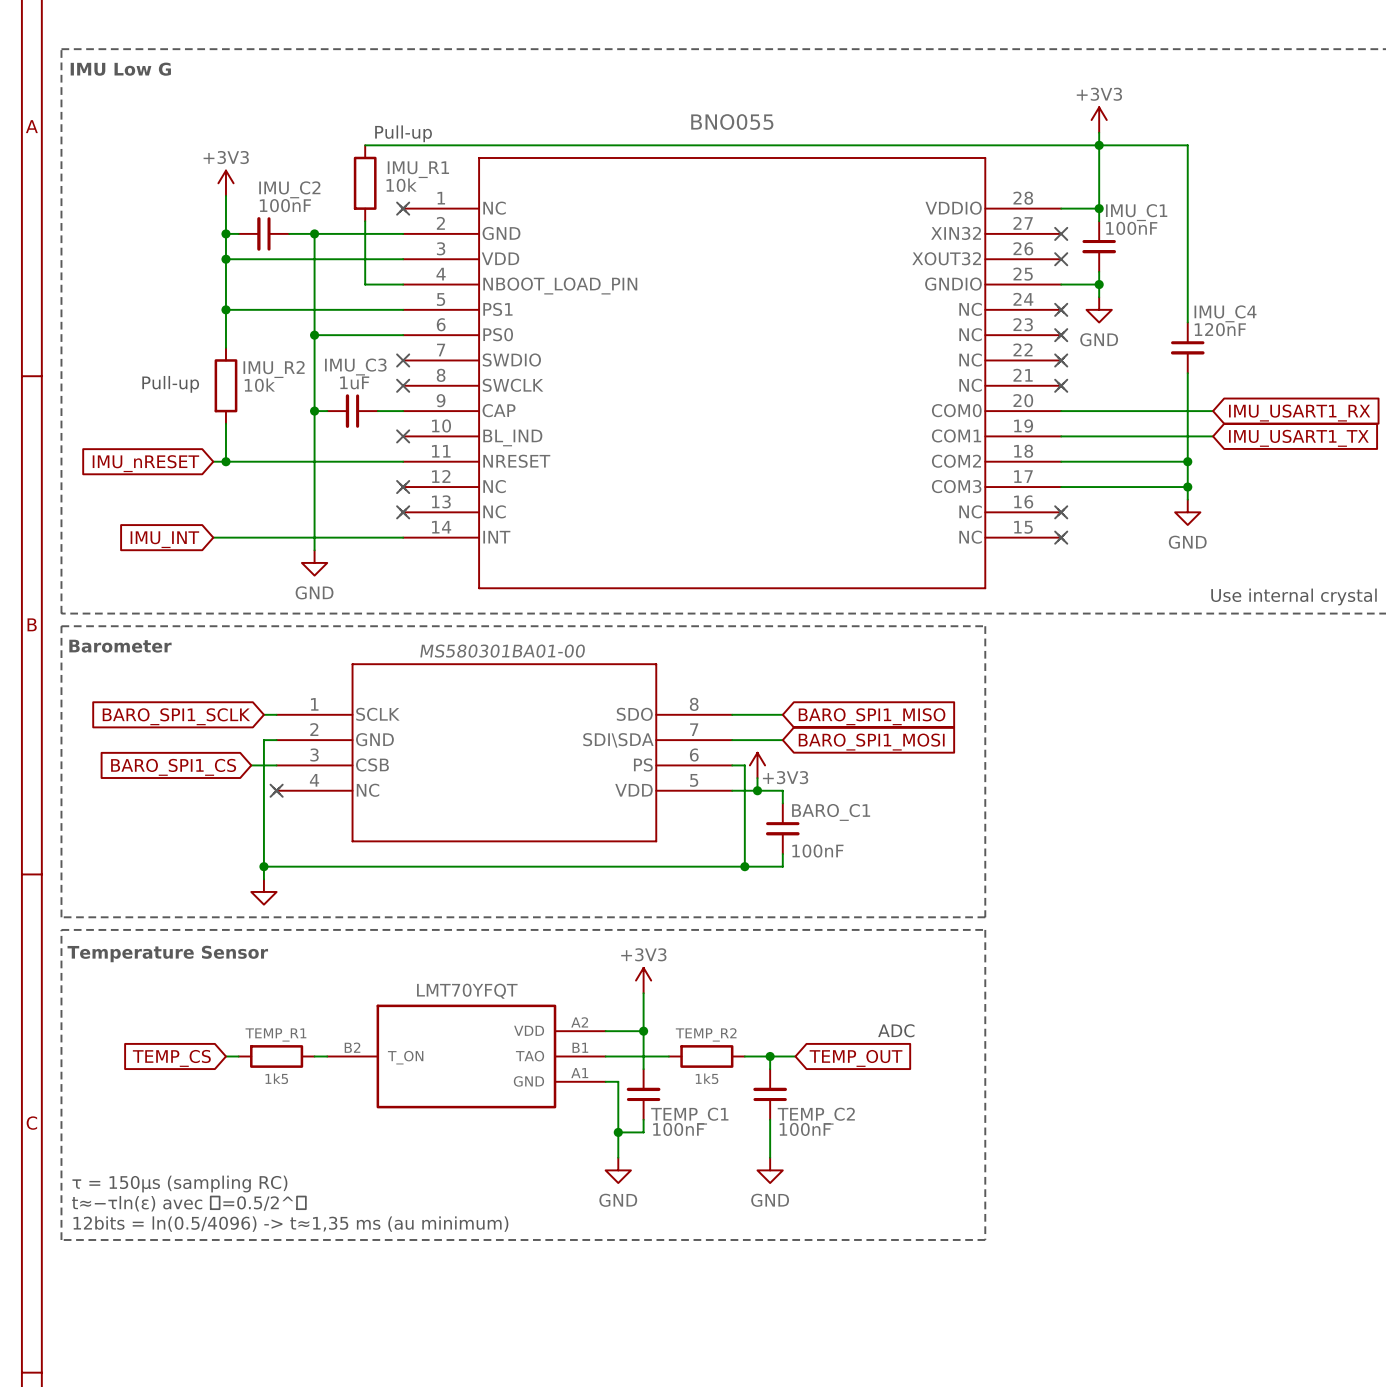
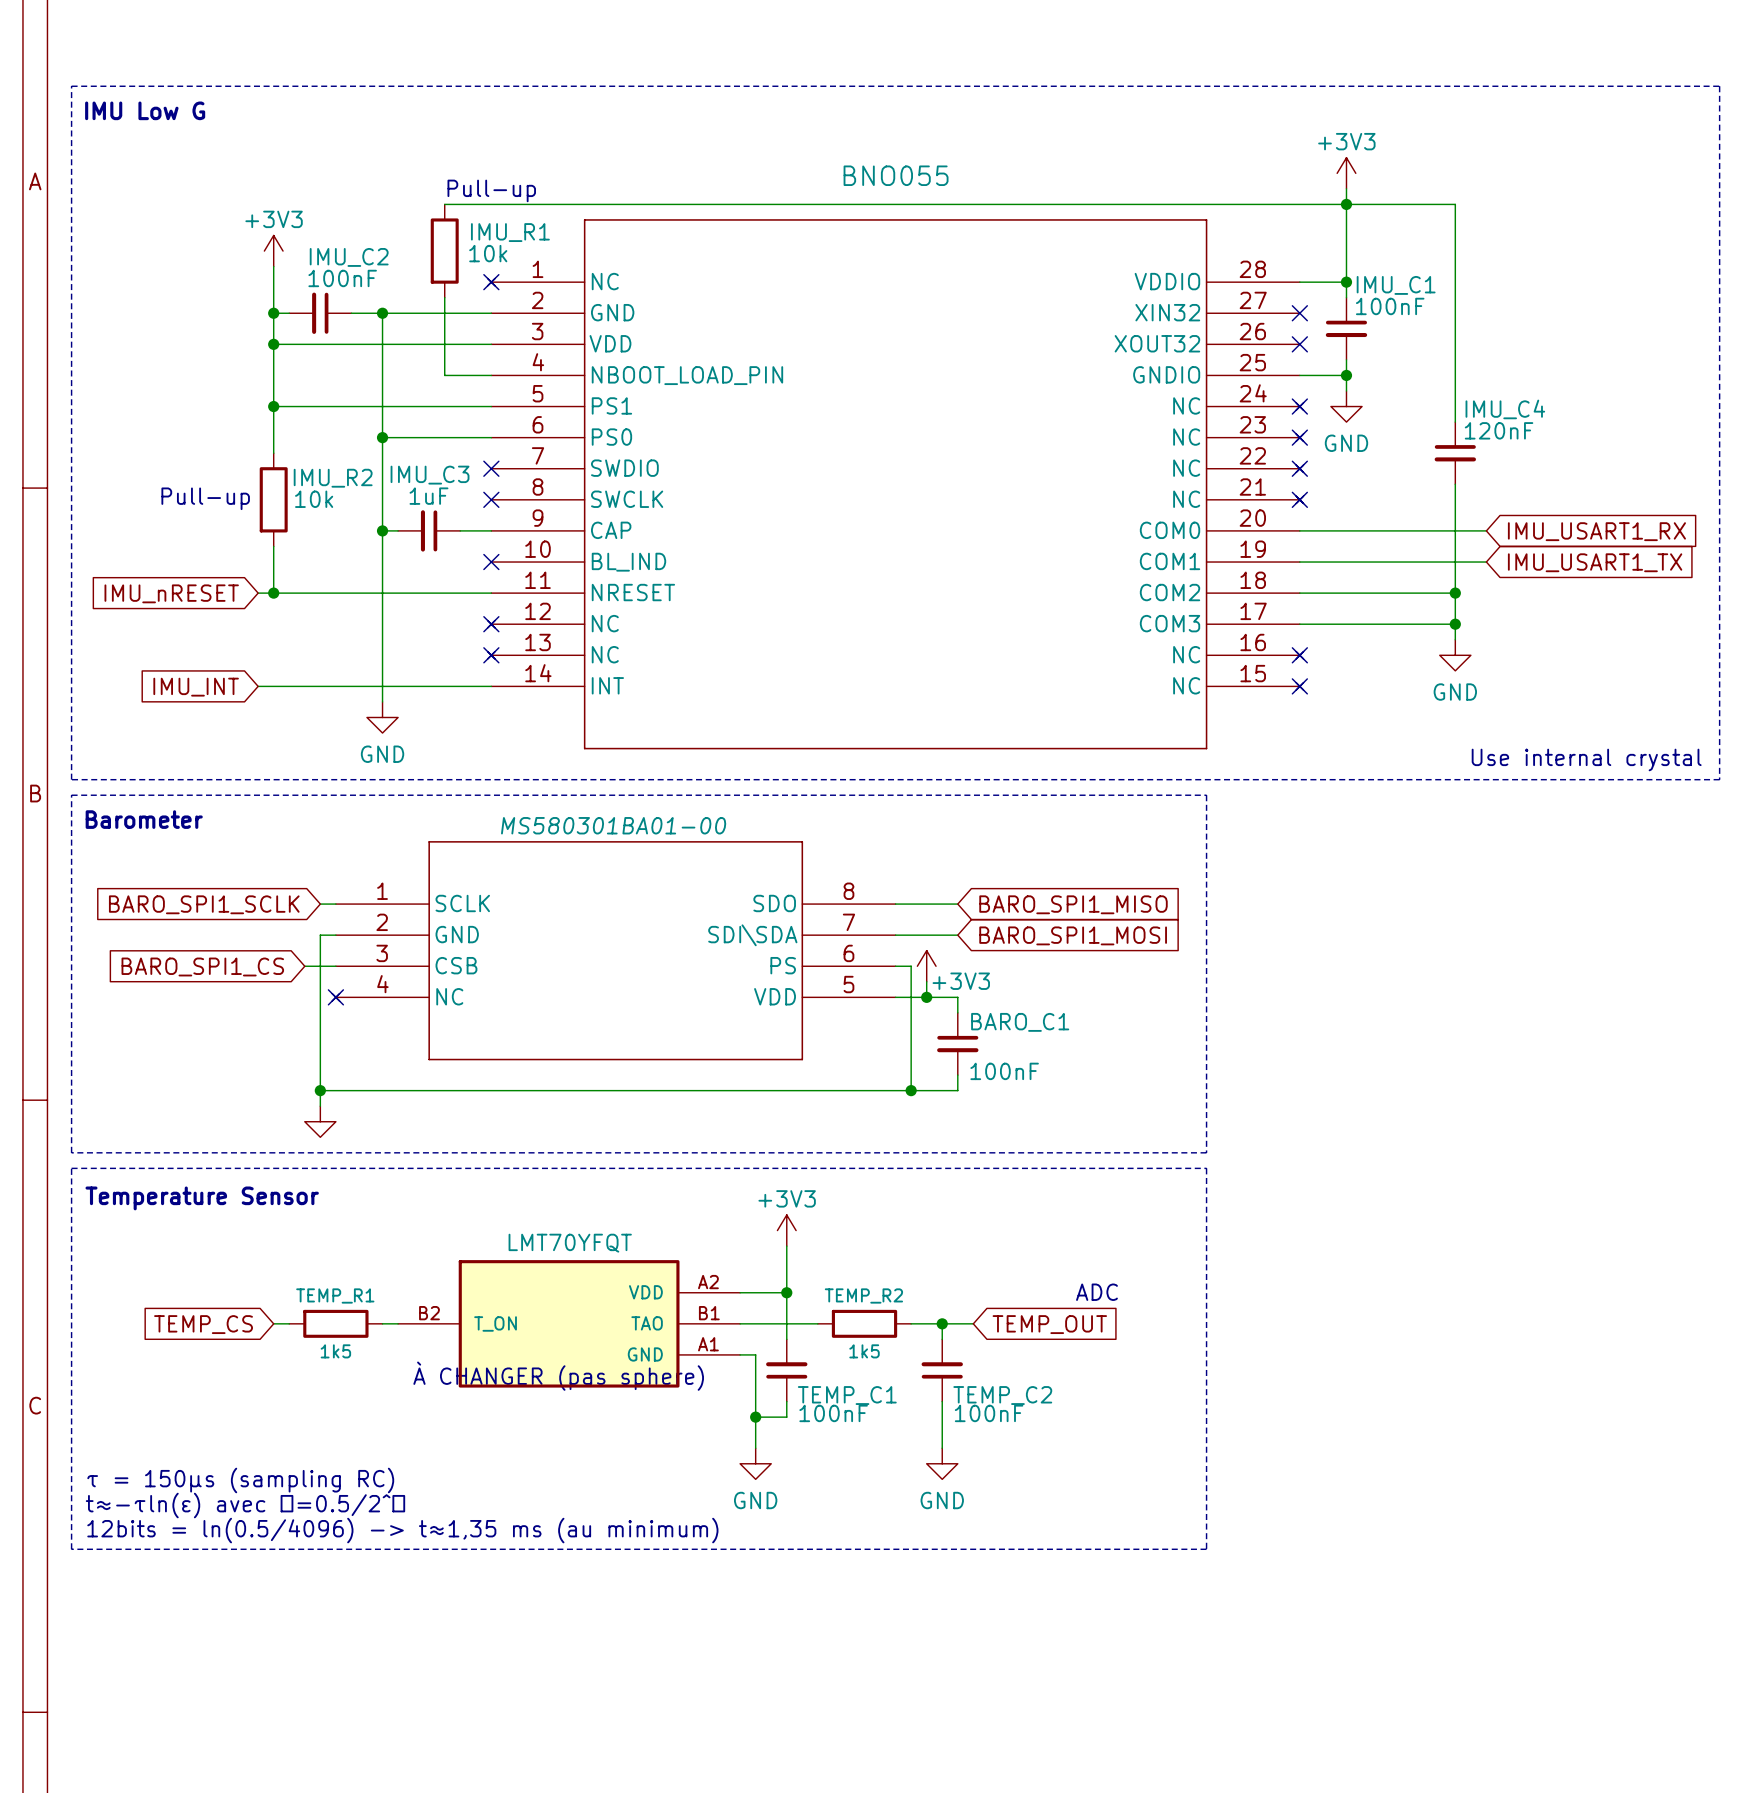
text: none -> À CHANGER (pas sphere) (558, 1376)

